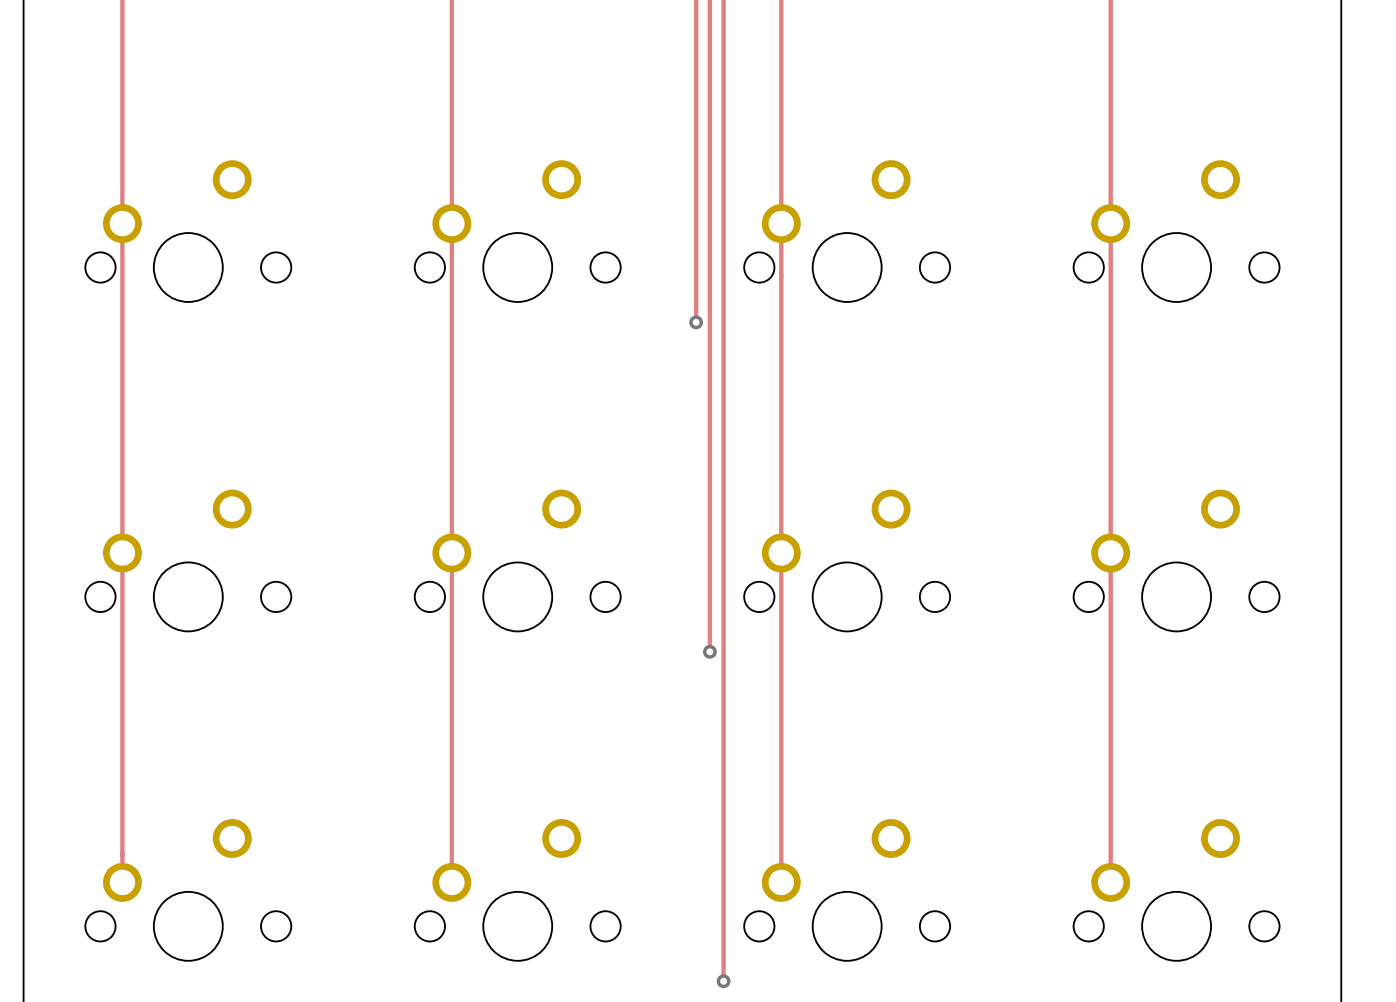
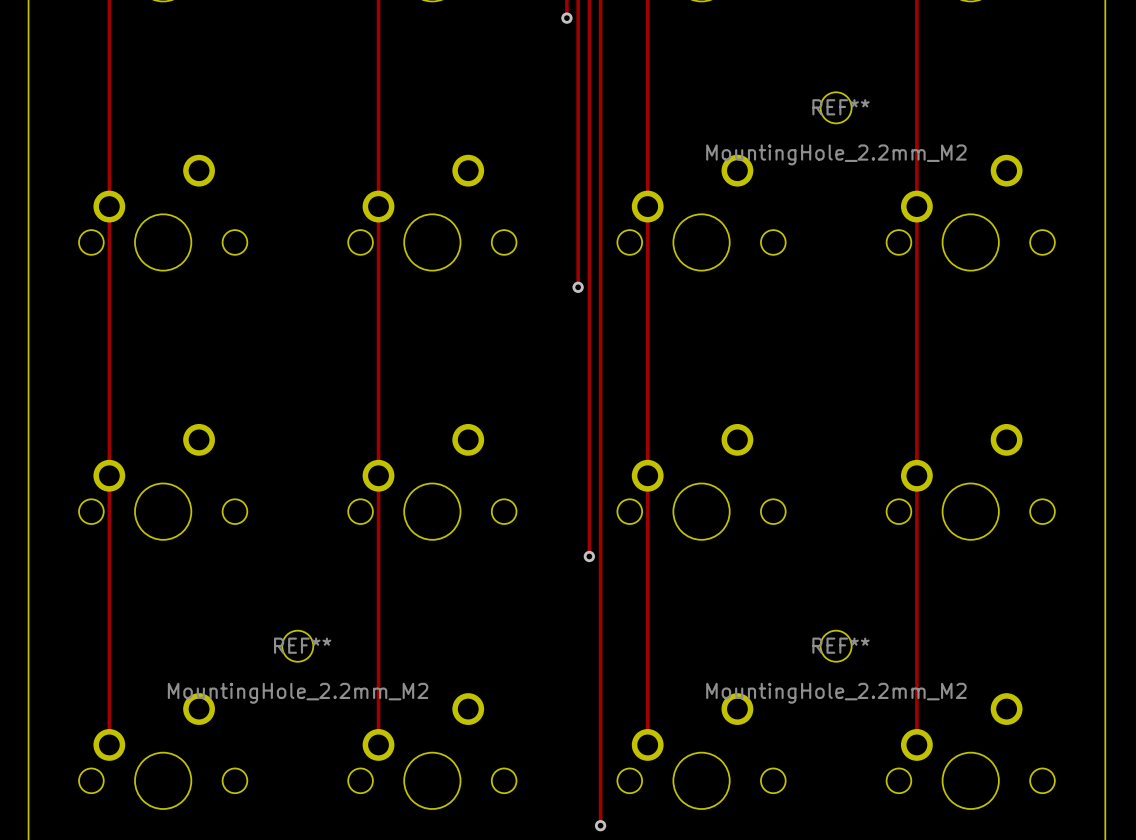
REF**: none -> MountingHole_2.2mm_M2 (836, 107)
REF**: none -> MountingHole_2.2mm_M2 (297, 646)
REF**: none -> MountingHole_2.2mm_M2 (836, 646)

